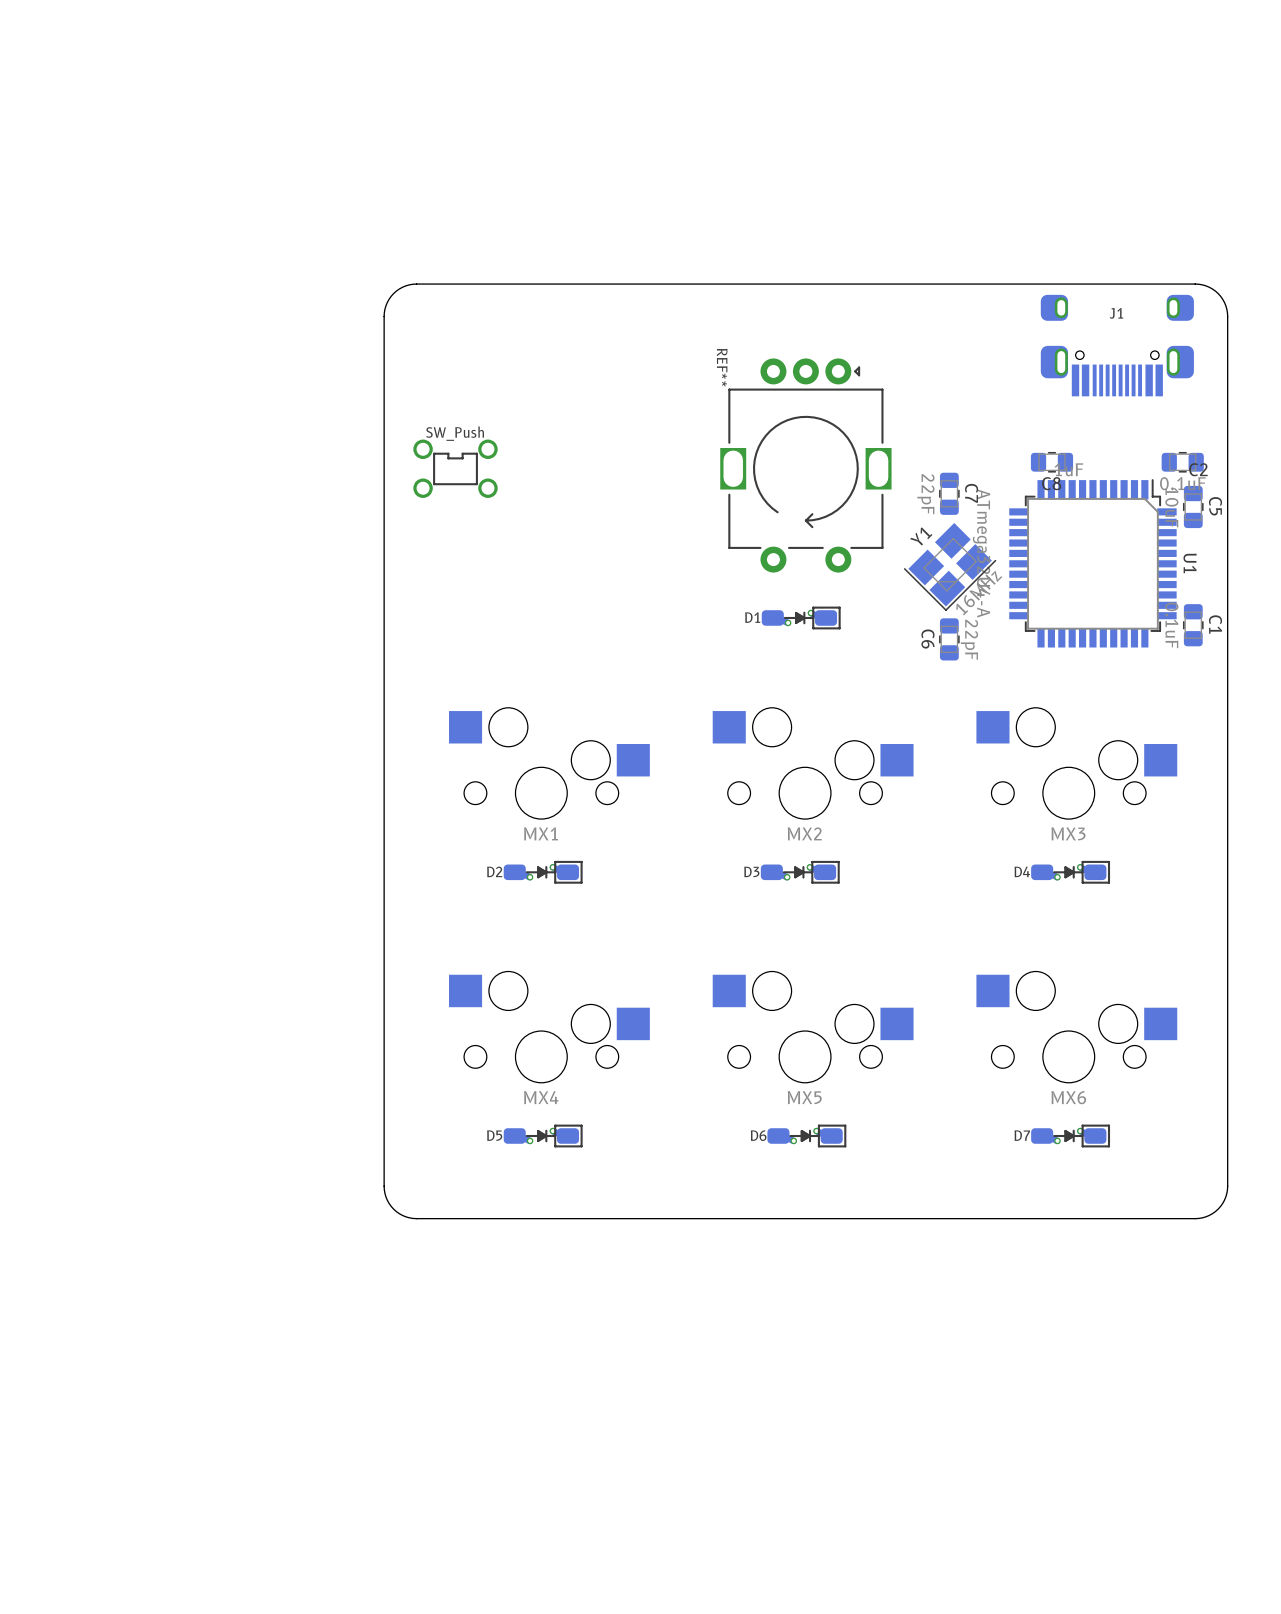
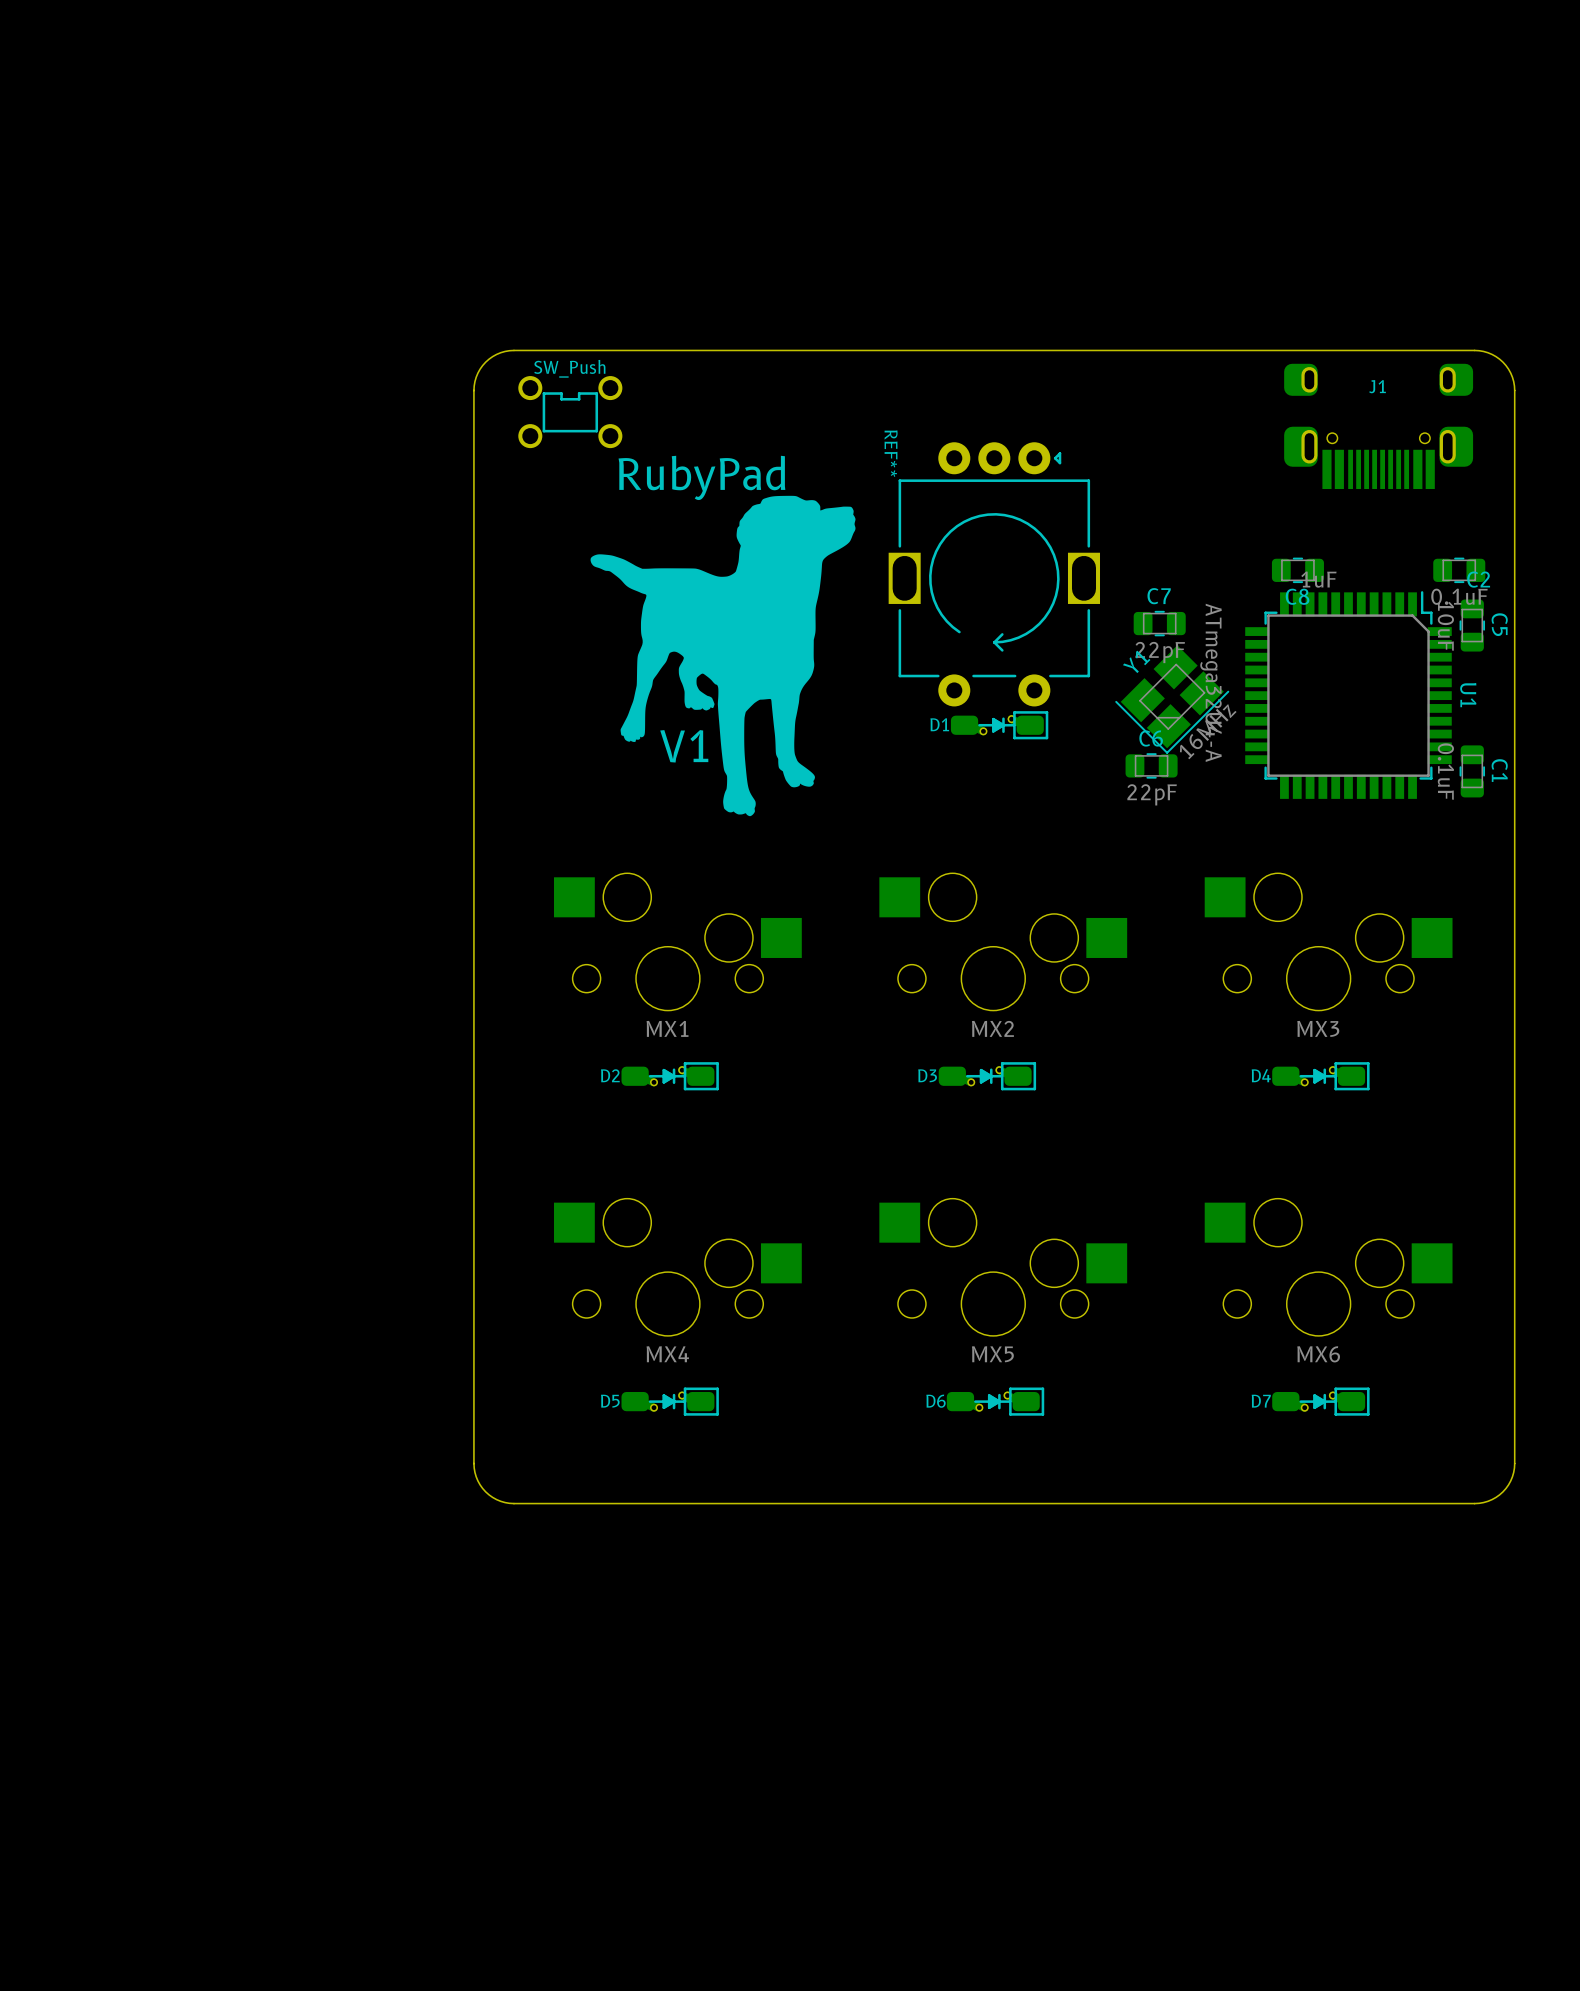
drawing: none -> [590, 495, 856, 817]
part position: (455, 468) -> (570, 412)
C7 rotation: 0° (949, 493) -> 90° clockwise (1159, 623)
C7 name position: C7 (971, 493) -> C7 (1159, 596)
C7 value position: 22pF (925, 494) -> 22pF (1160, 652)
D1 position: (801, 617) -> (999, 725)
C6 rotation: 0° (949, 639) -> 90° clockwise (1151, 765)

